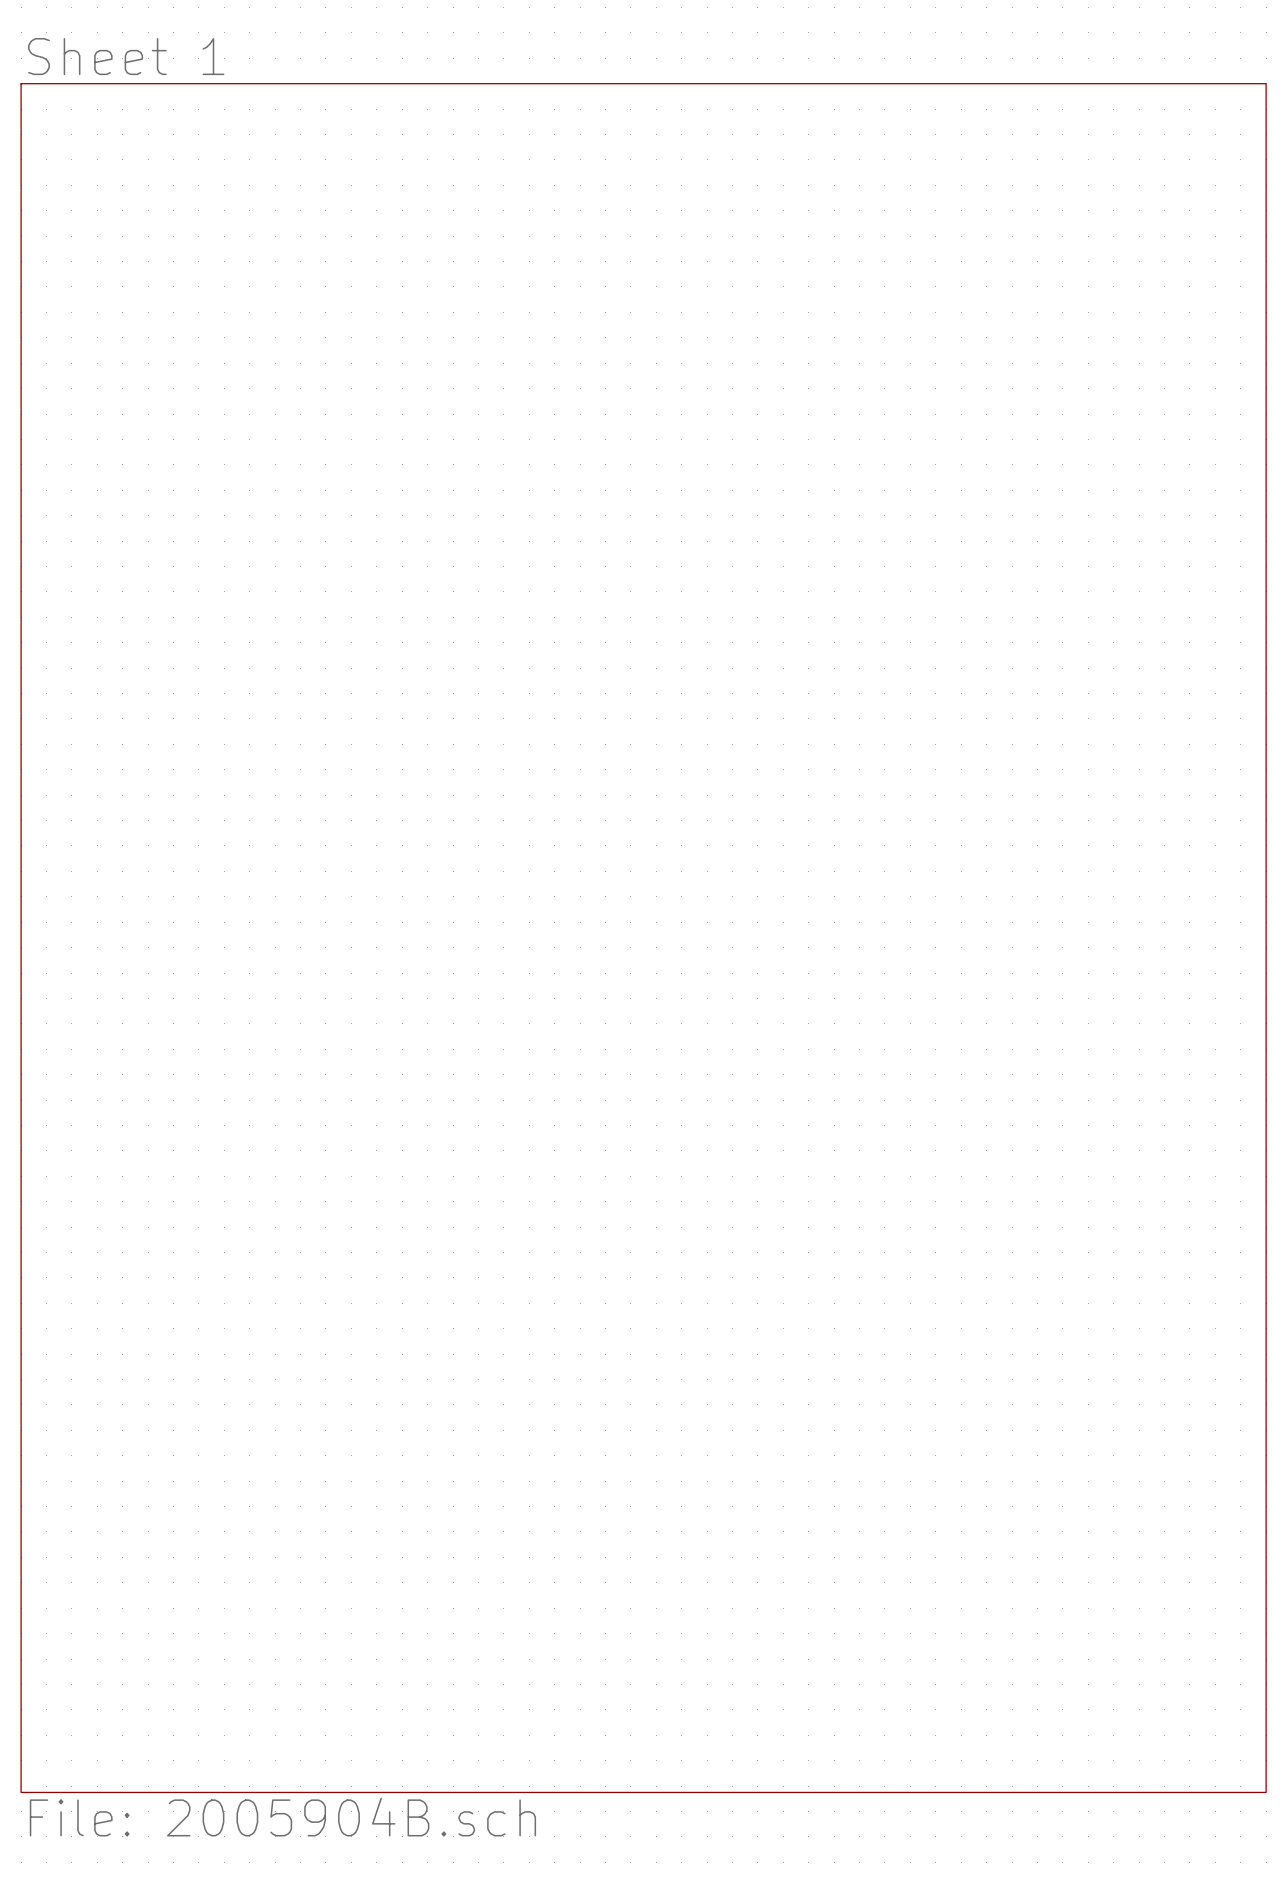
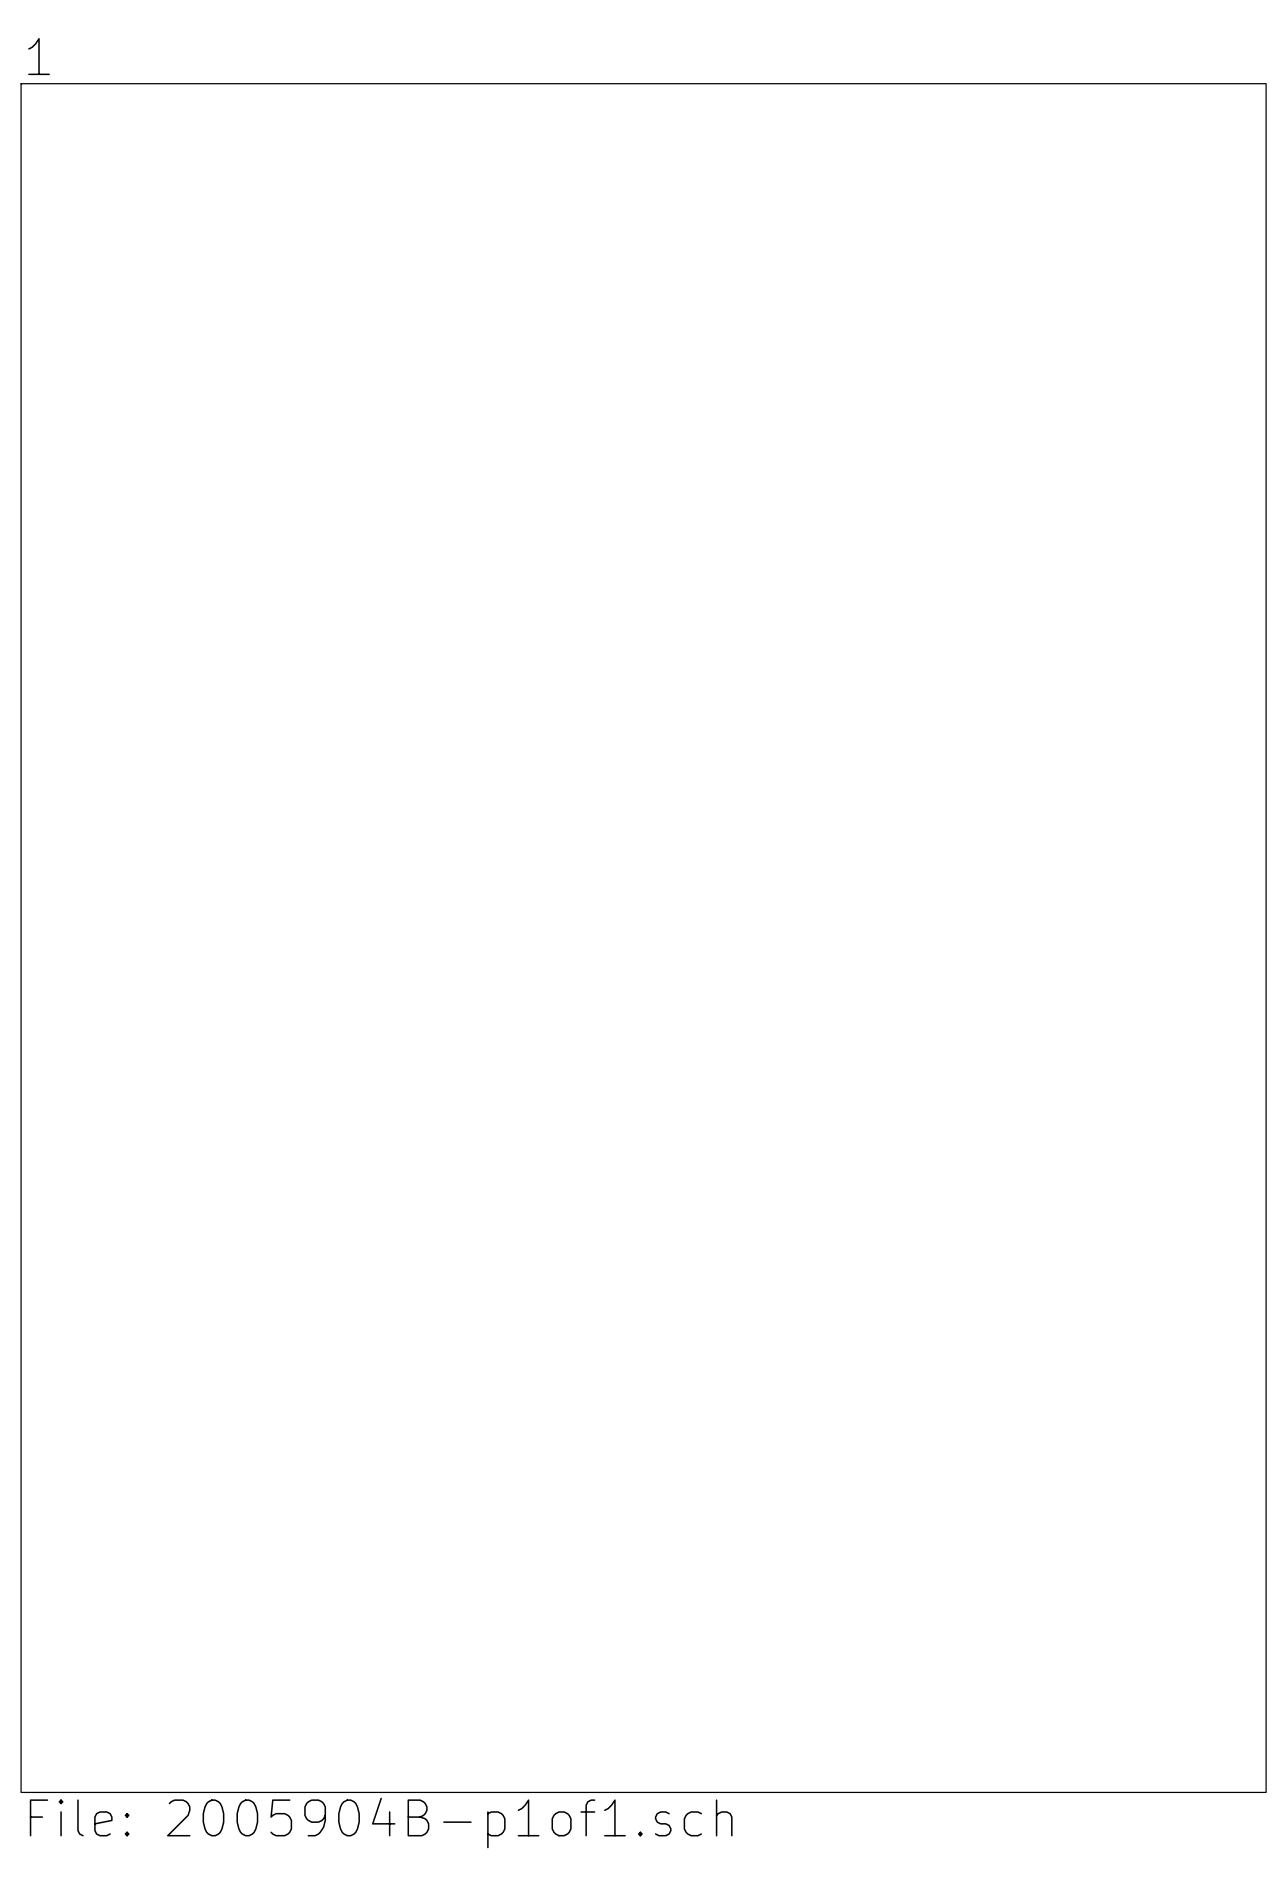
sheet Sheet 1 name: Sheet 1 (126, 56) -> 1 (39, 56)
sheet Sheet 1 value: File: 2005904B.sch (282, 1817) -> File: 2005904B-p1of1.sch (381, 1822)

